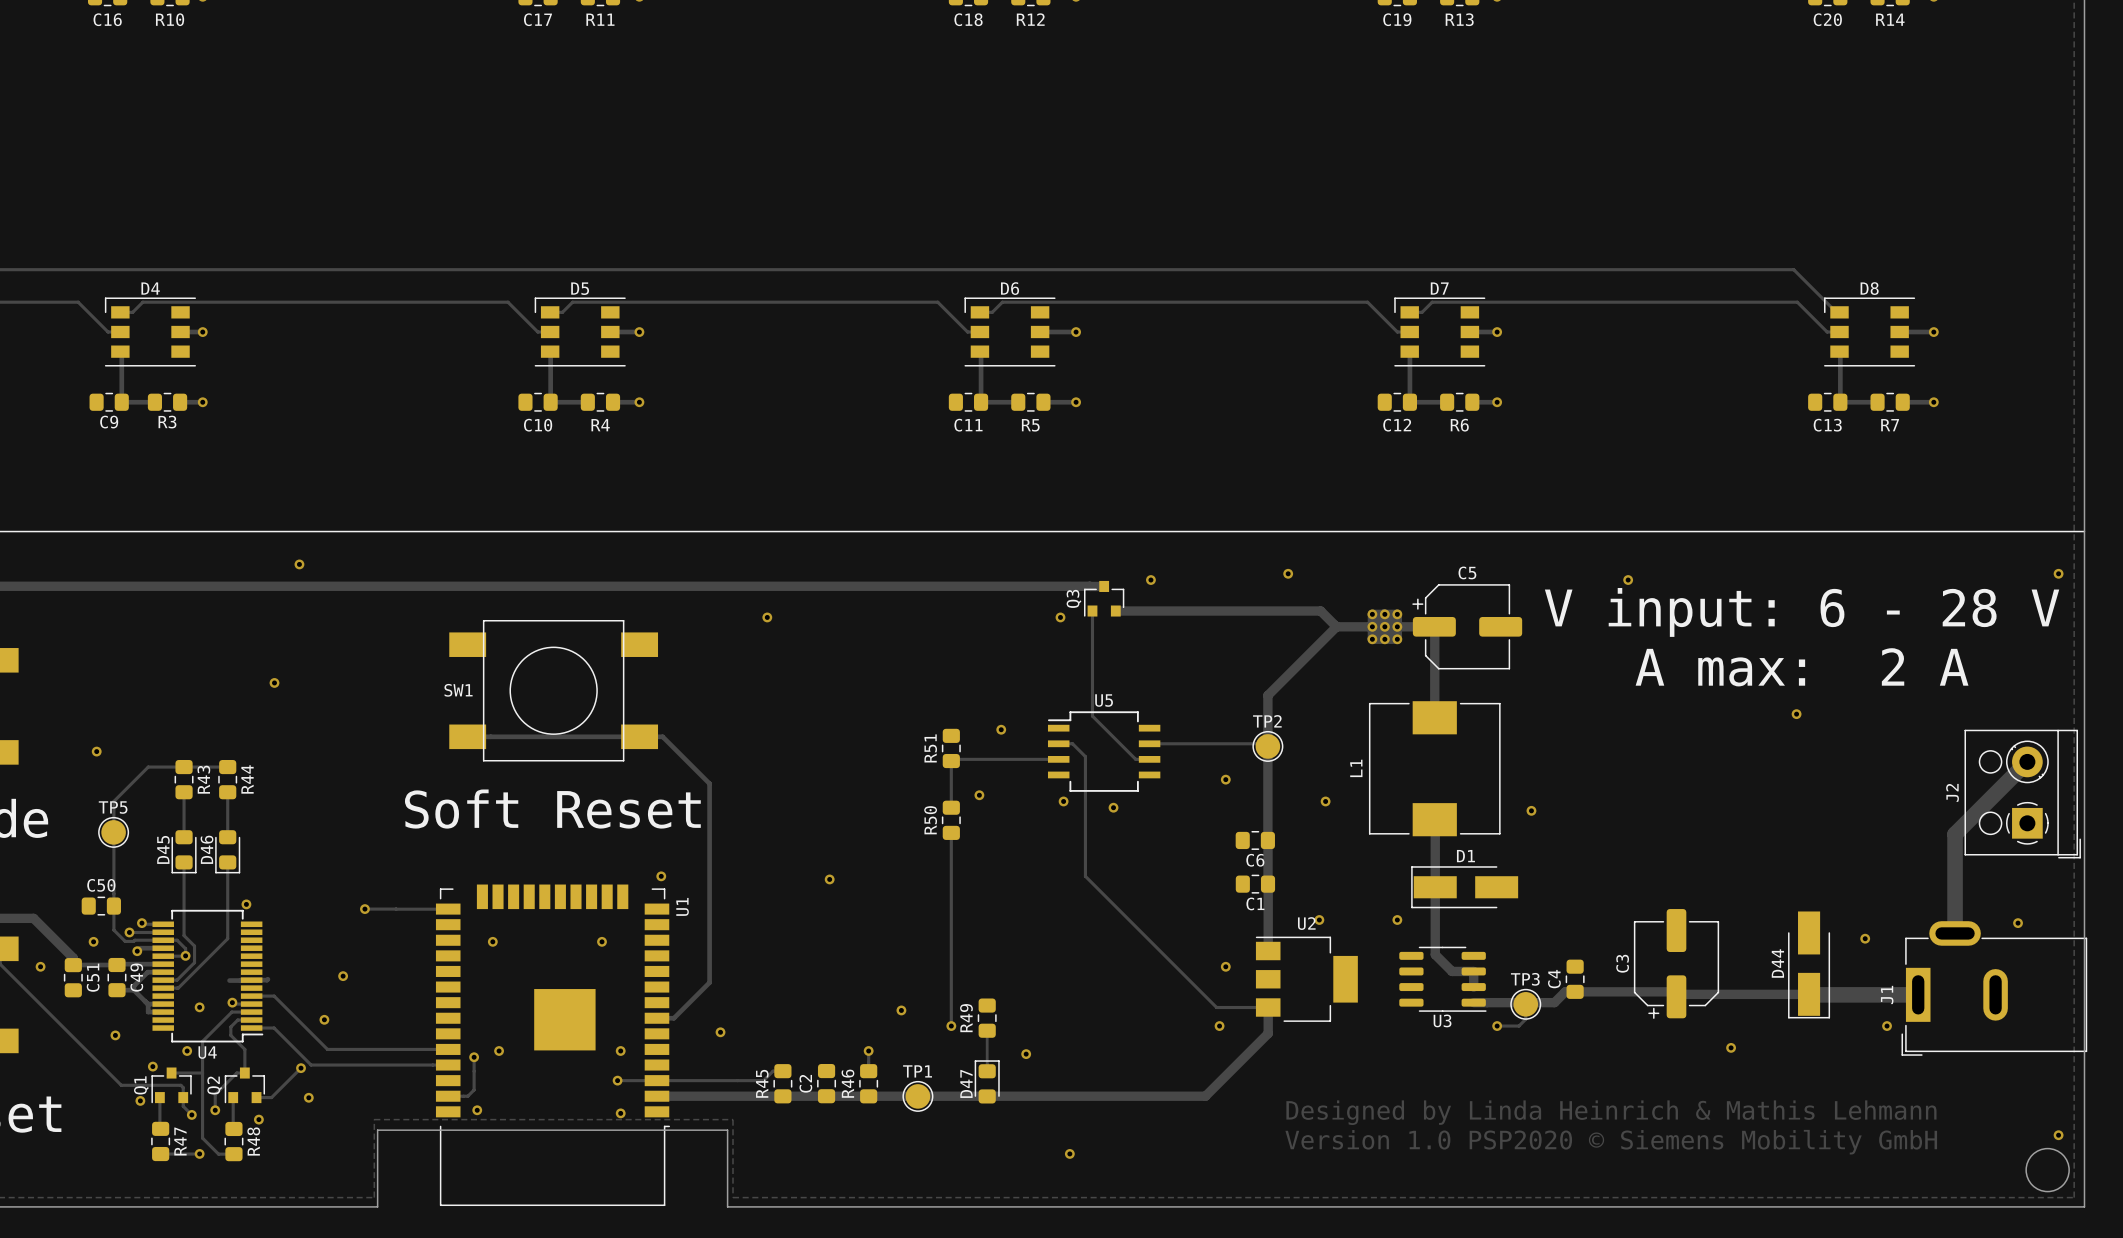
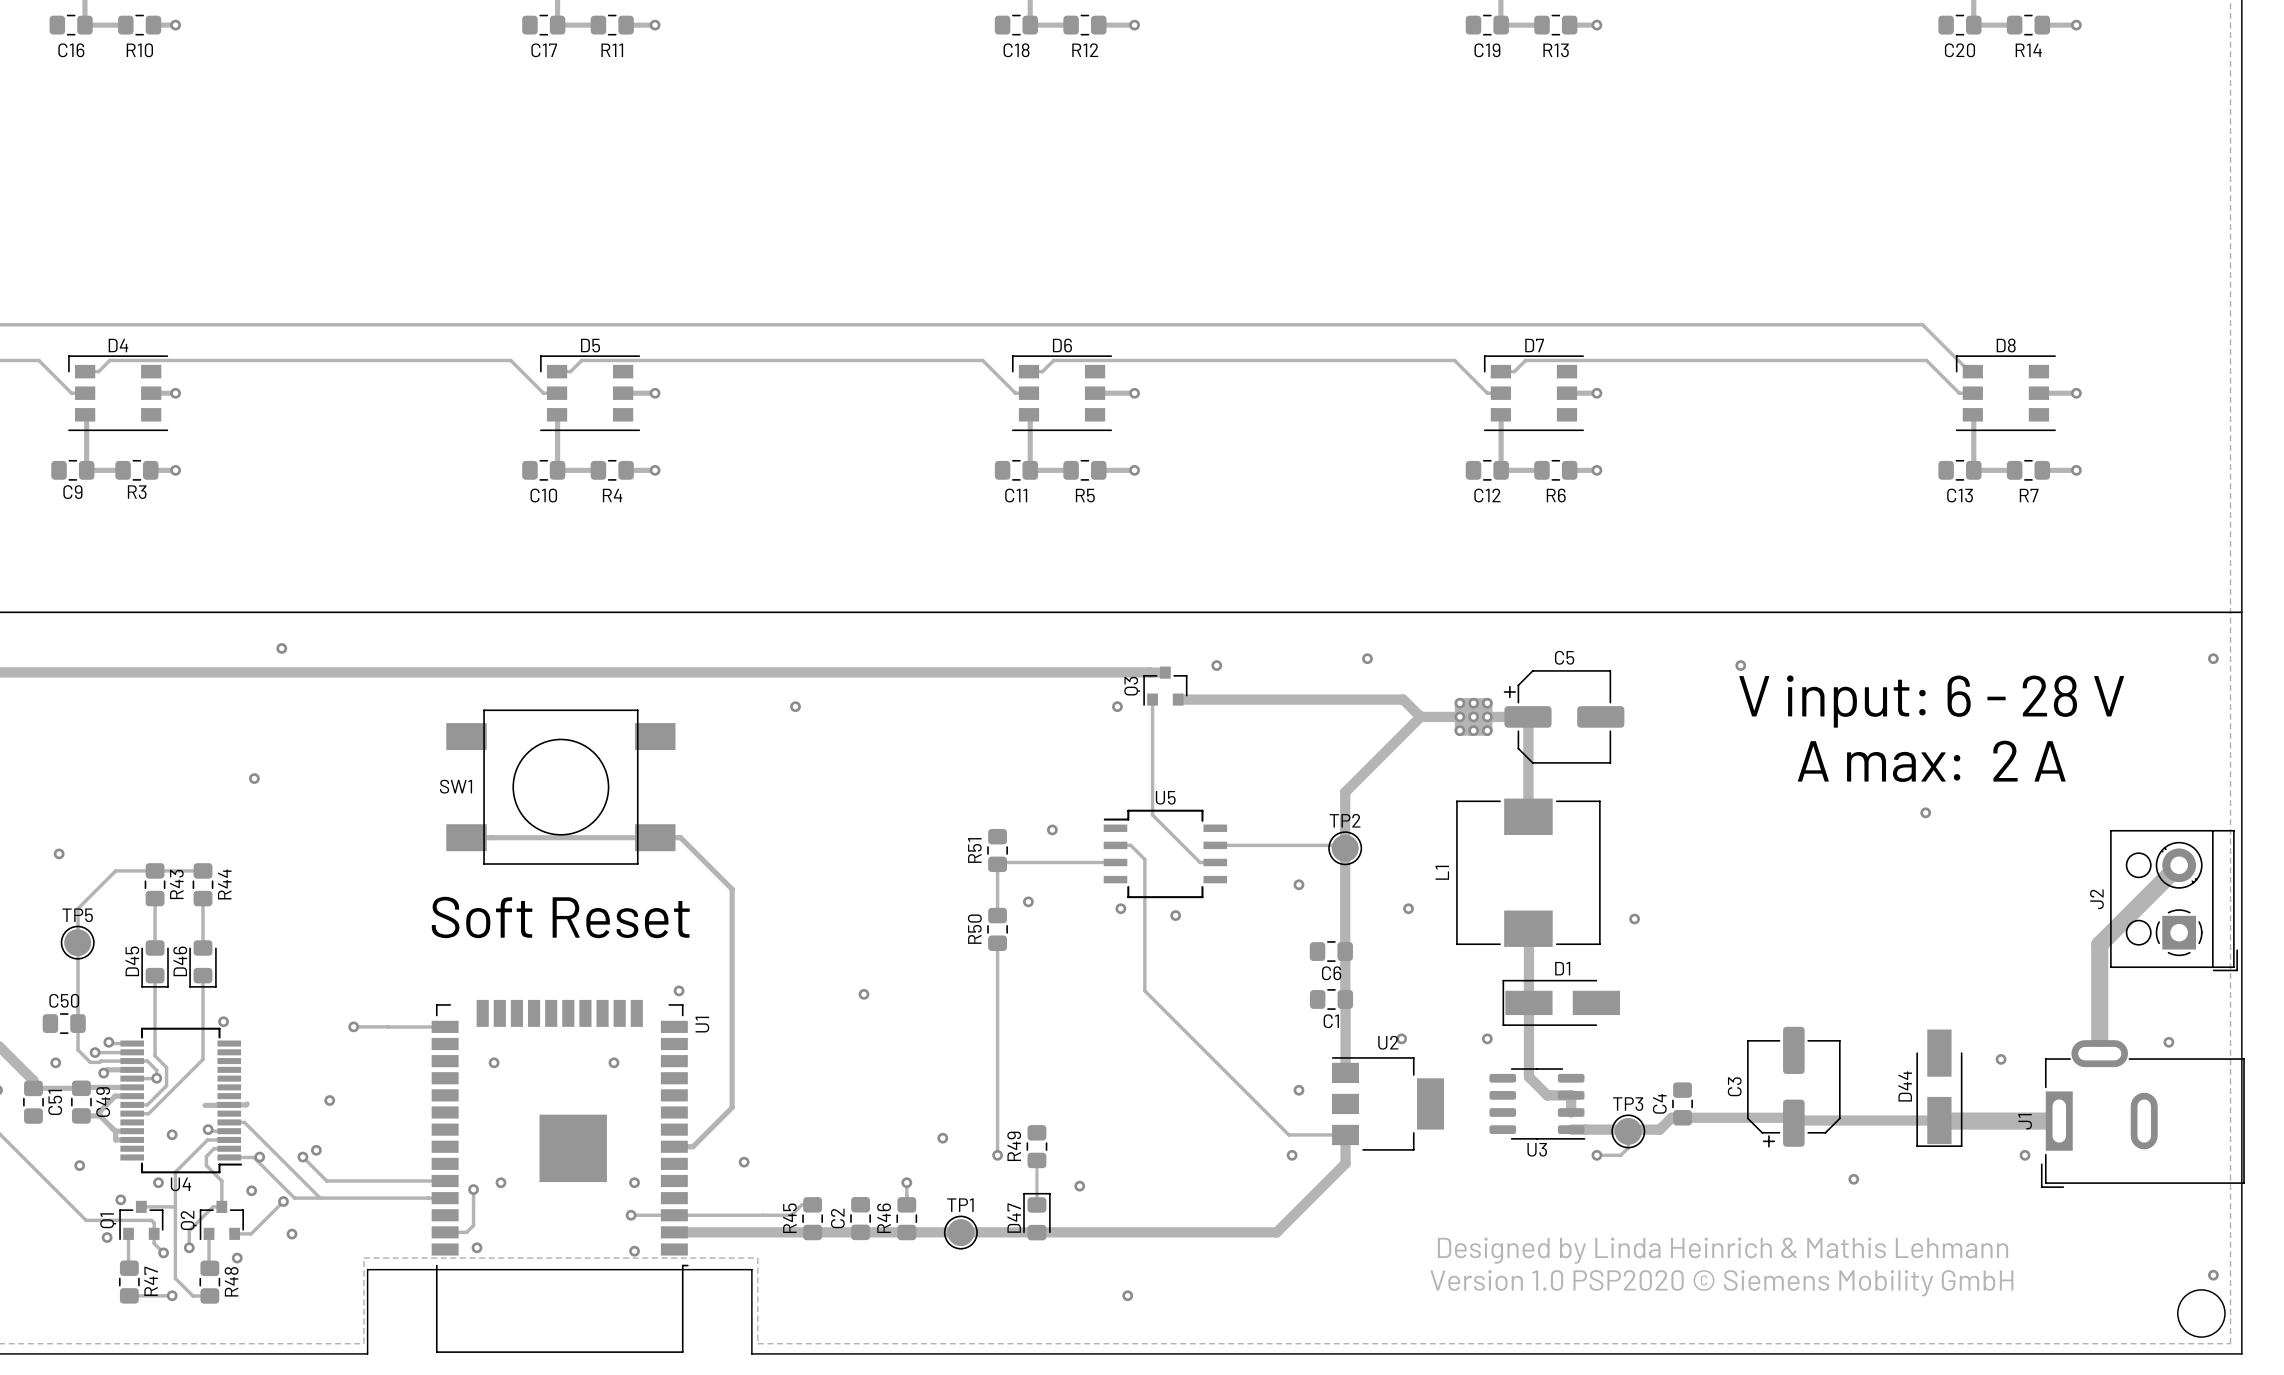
track: (265, 996) (274, 996) (327, 1049) (340, 1049) -> (244, 1122) (320, 1198)
via: (324, 1019) -> none
via: none -> (316, 1150)
via: none -> (259, 1157)
track: none -> (302, 1157) (326, 1181)
via: none -> (302, 1157)
via: none -> (251, 1190)

